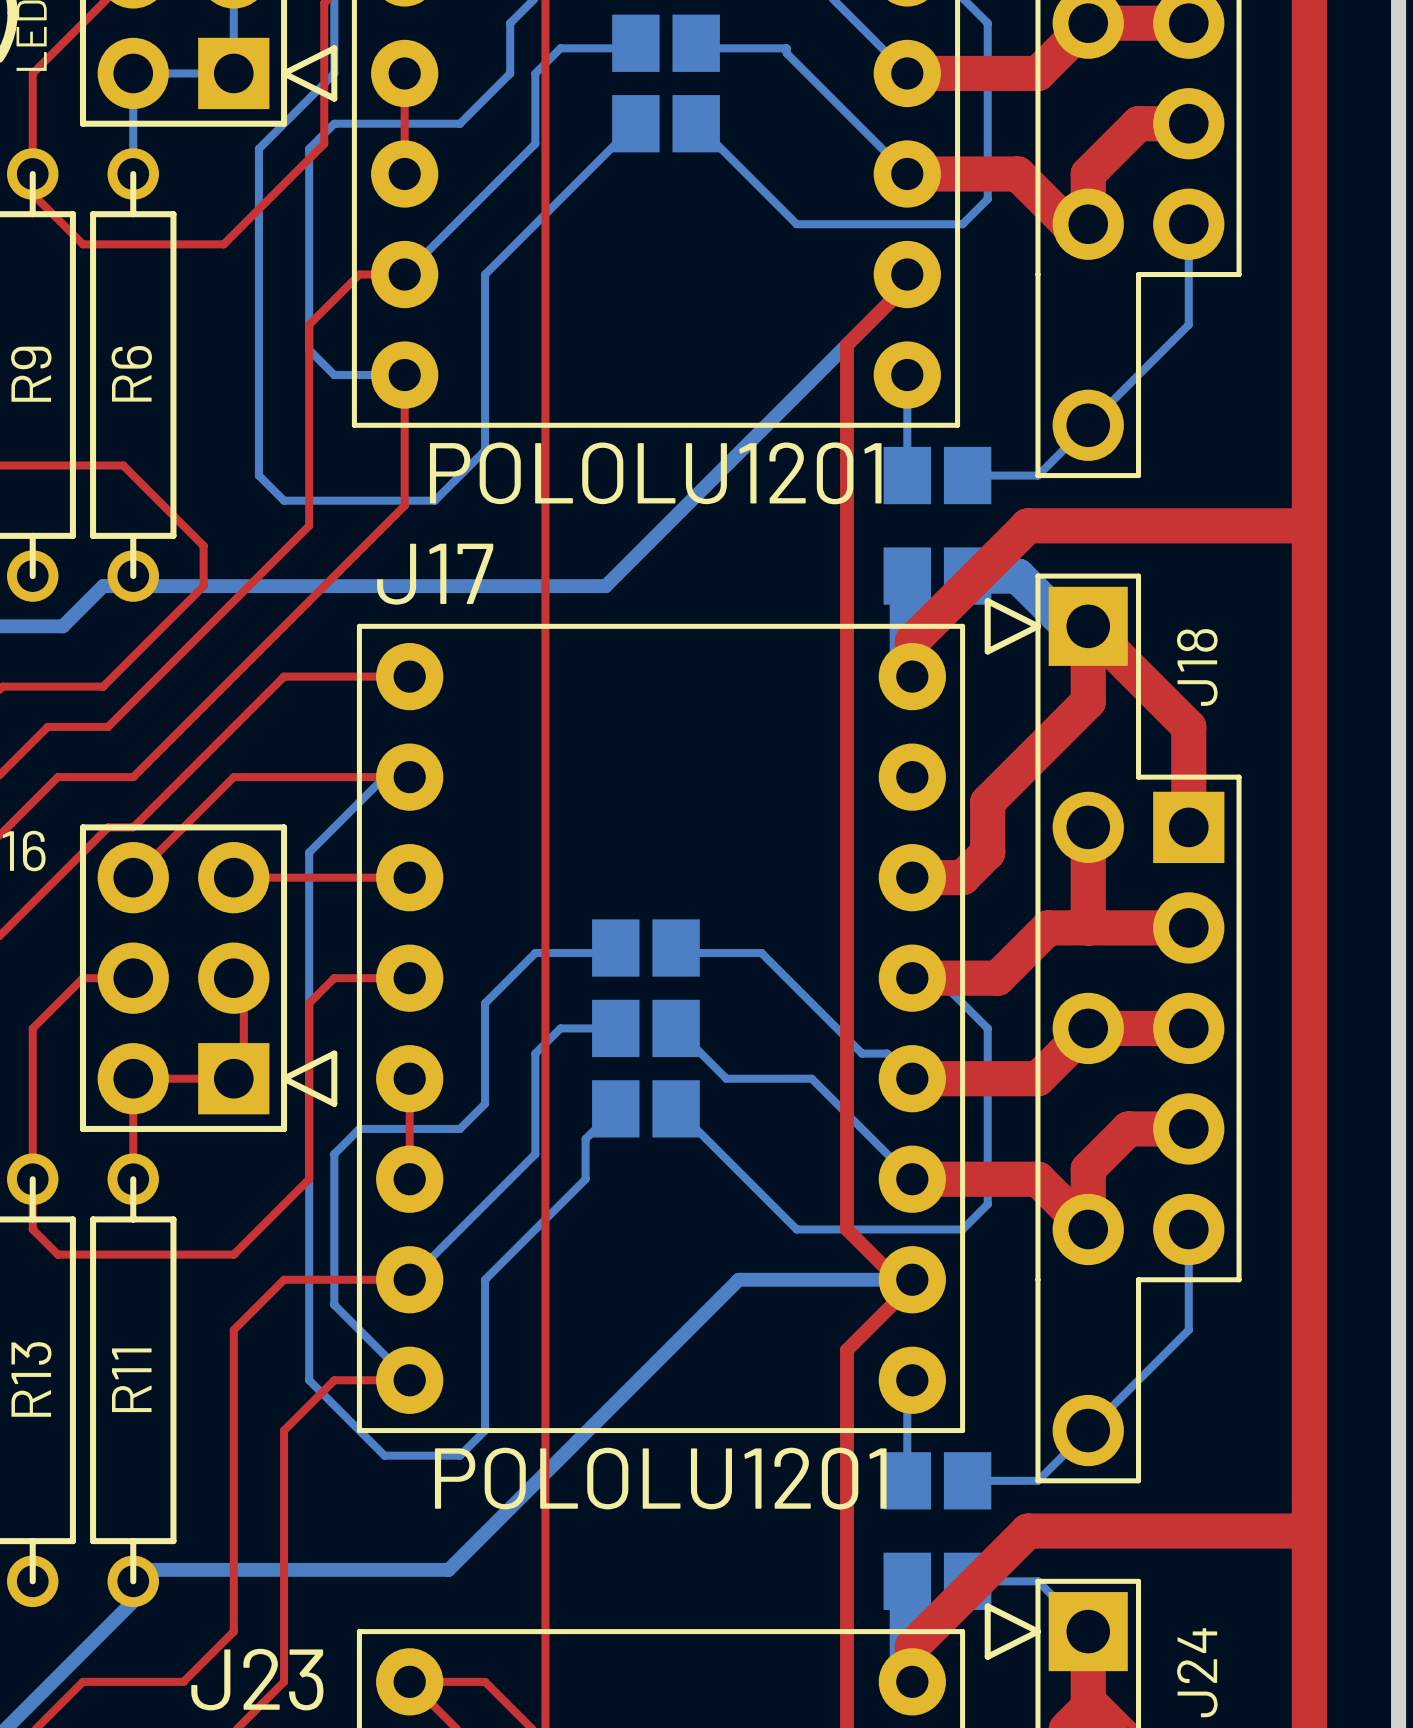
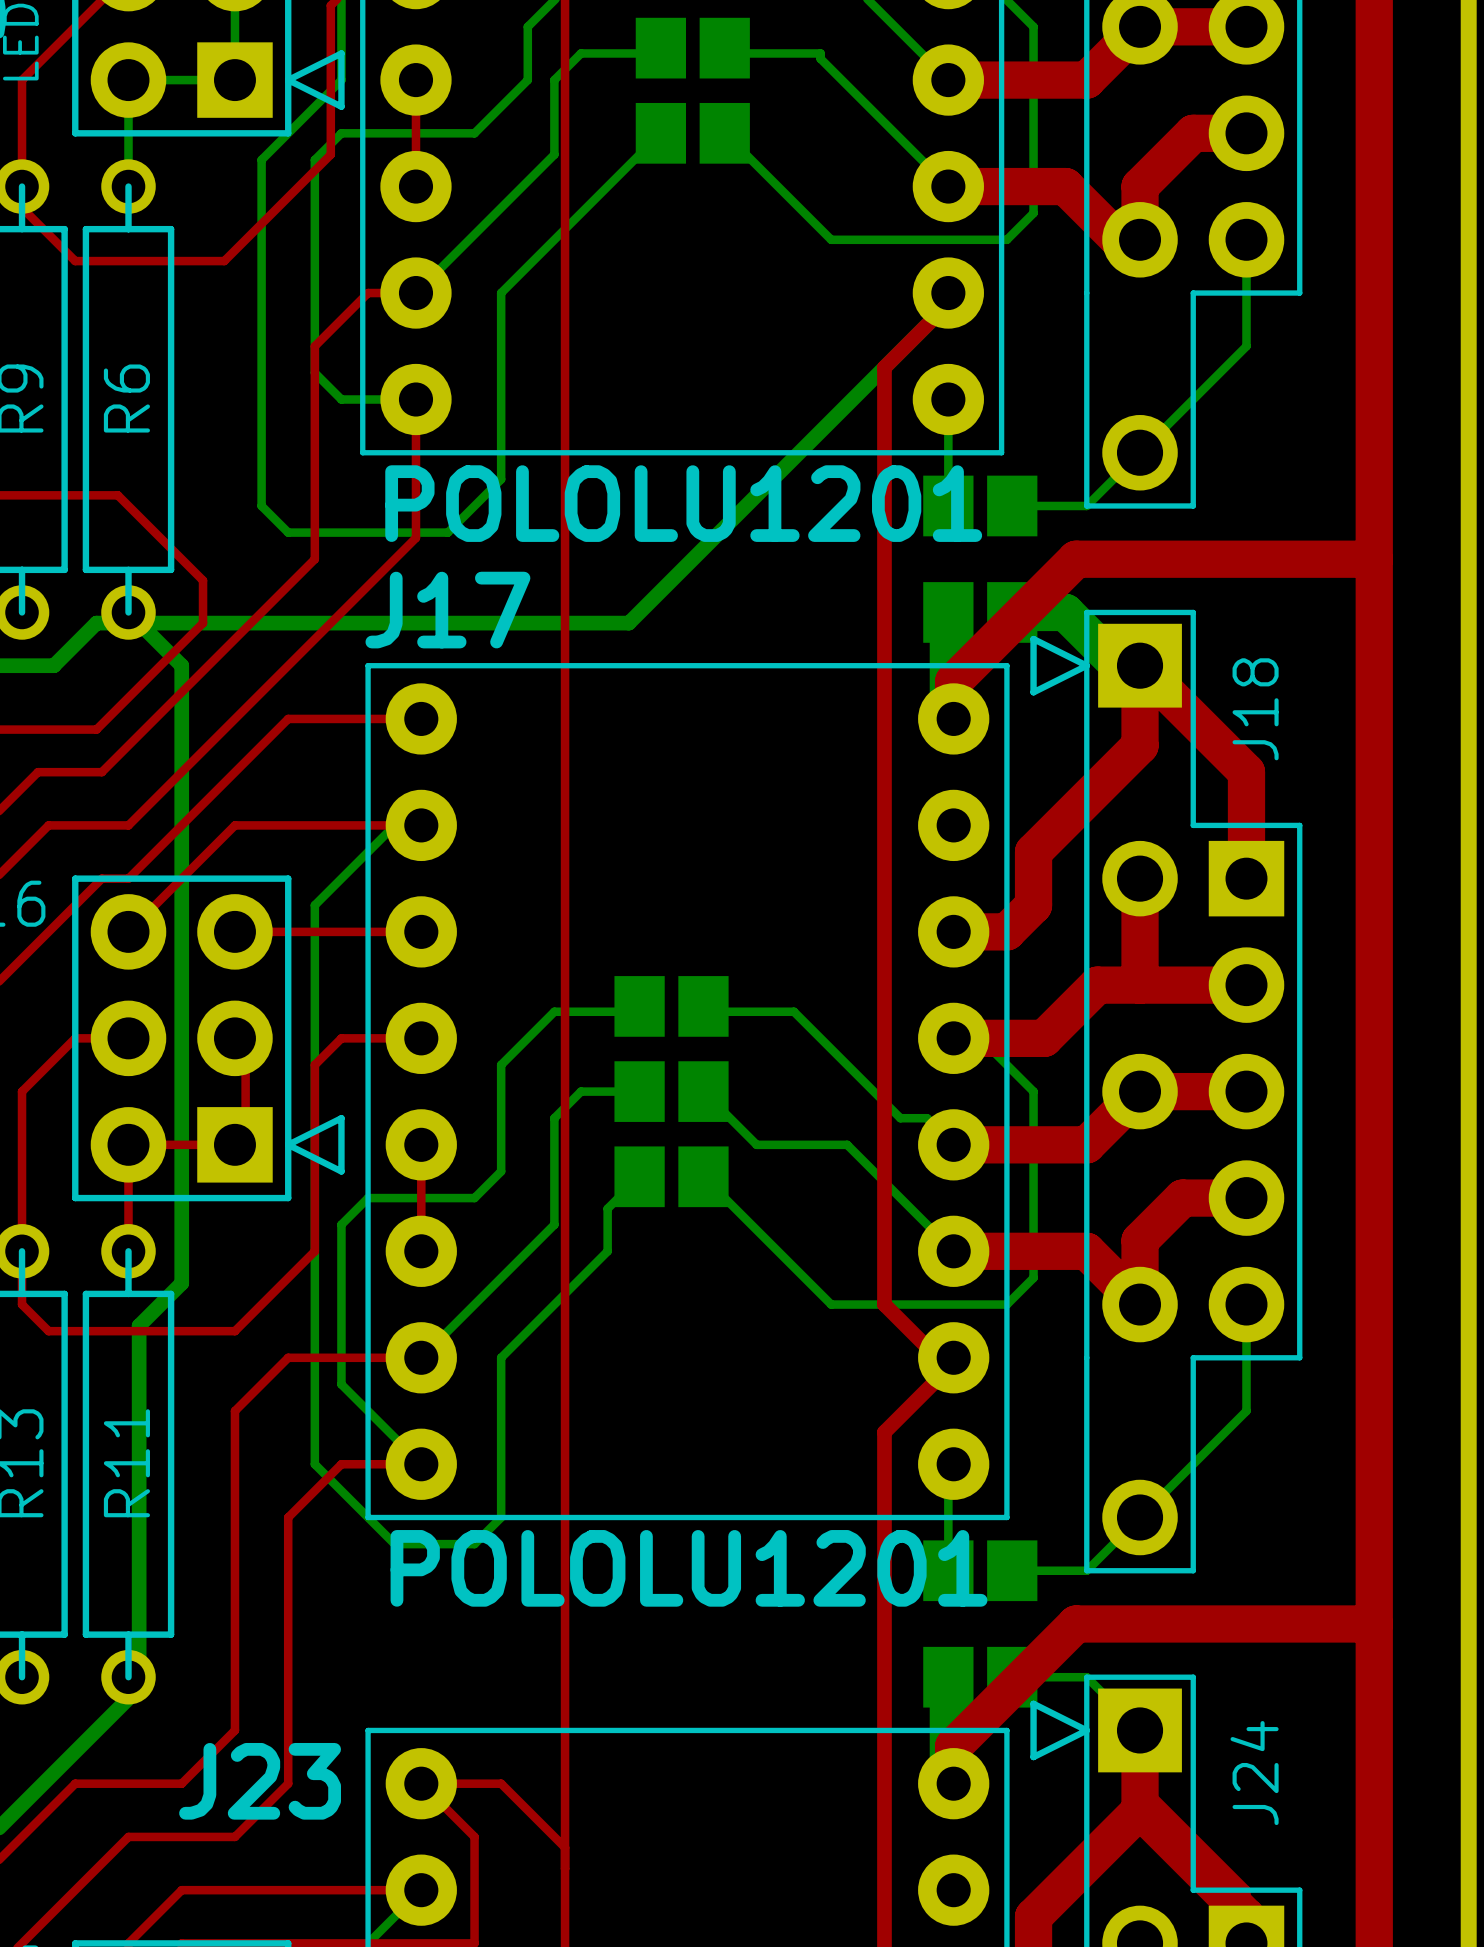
bottom track: none -> (139, 623) (181, 665) (181, 1283) (139, 1325) (139, 1687)
bottom track: (912, 1279) (738, 1279) (448, 1569) (144, 1569) (133, 1581) -> none

